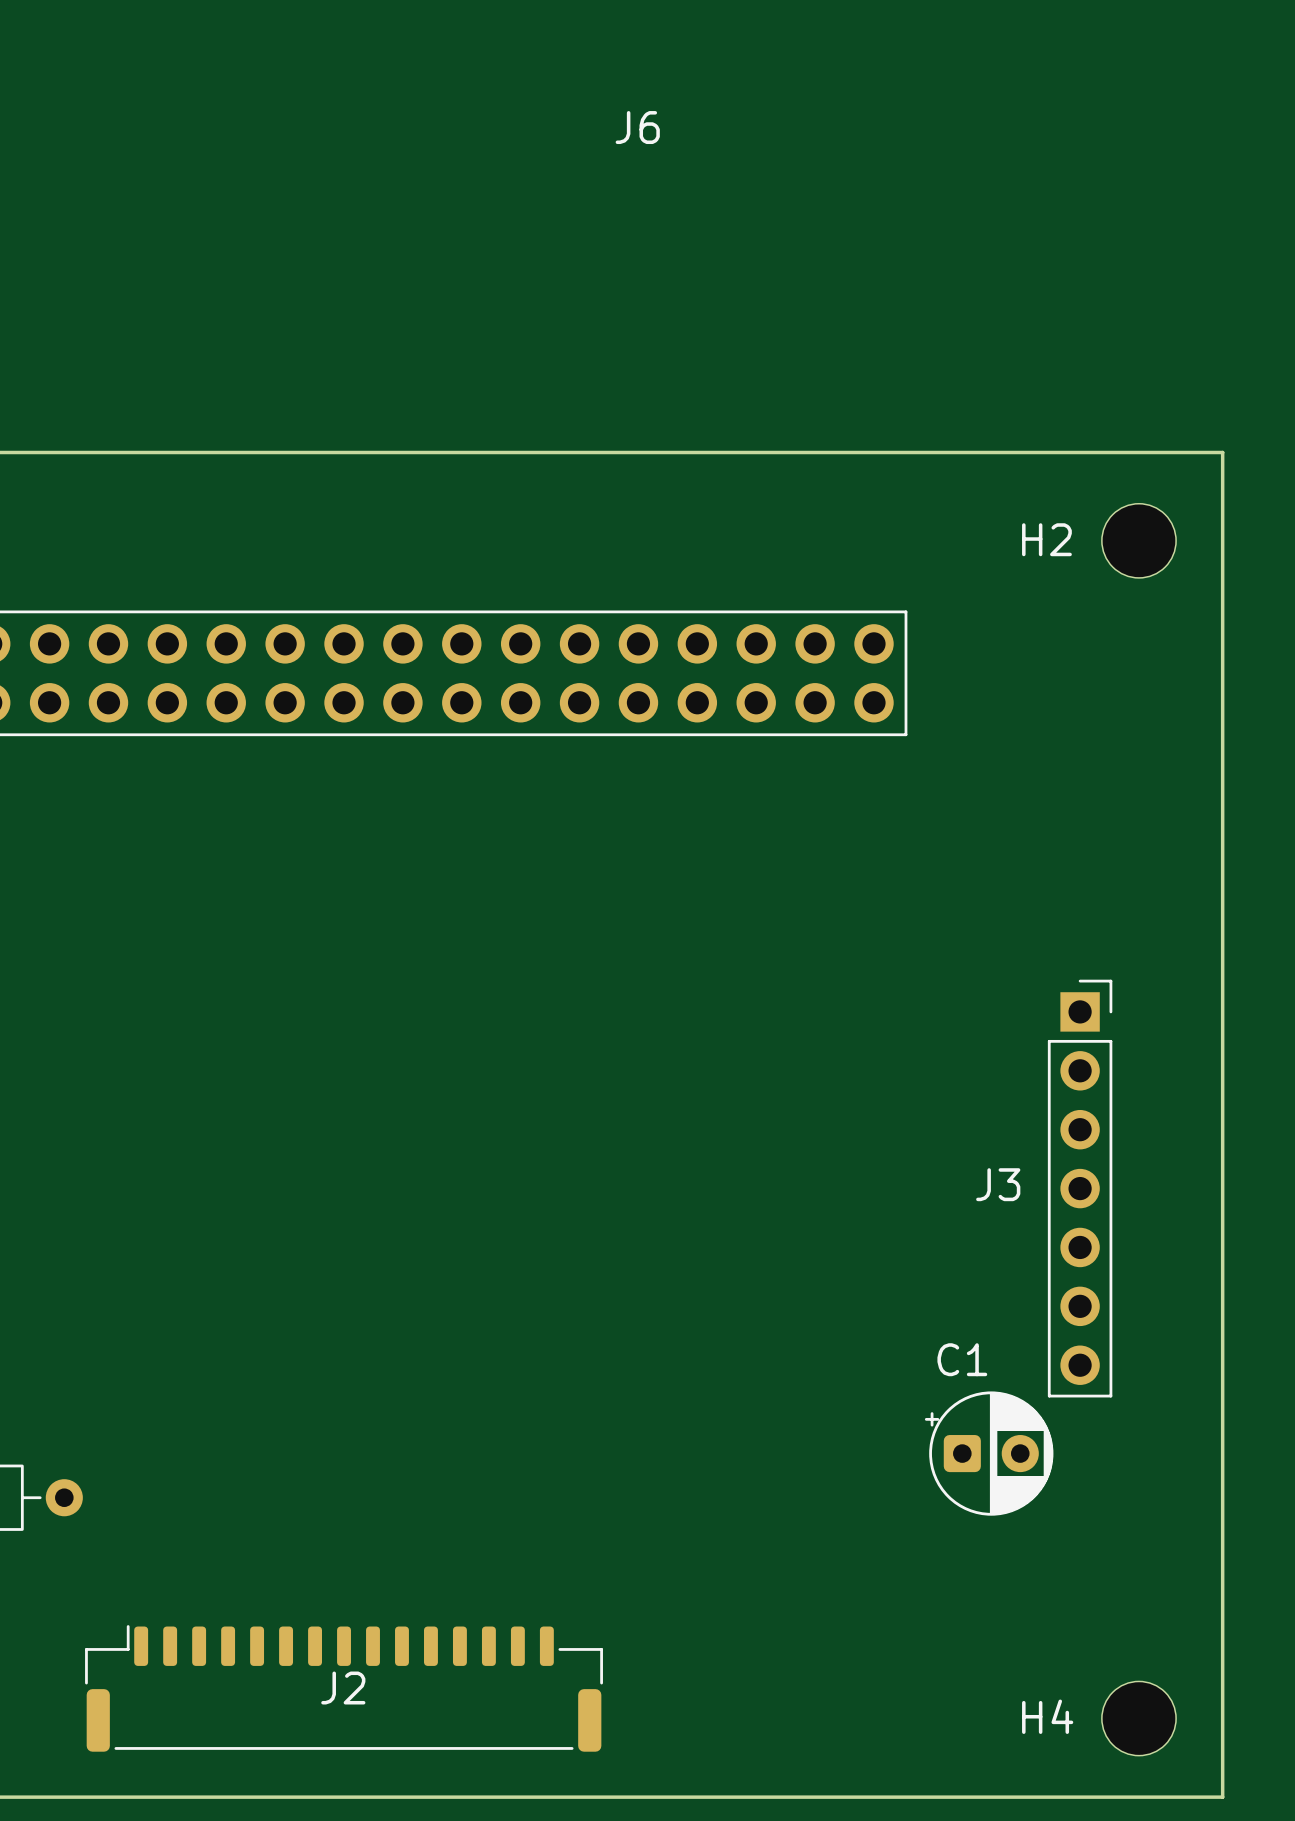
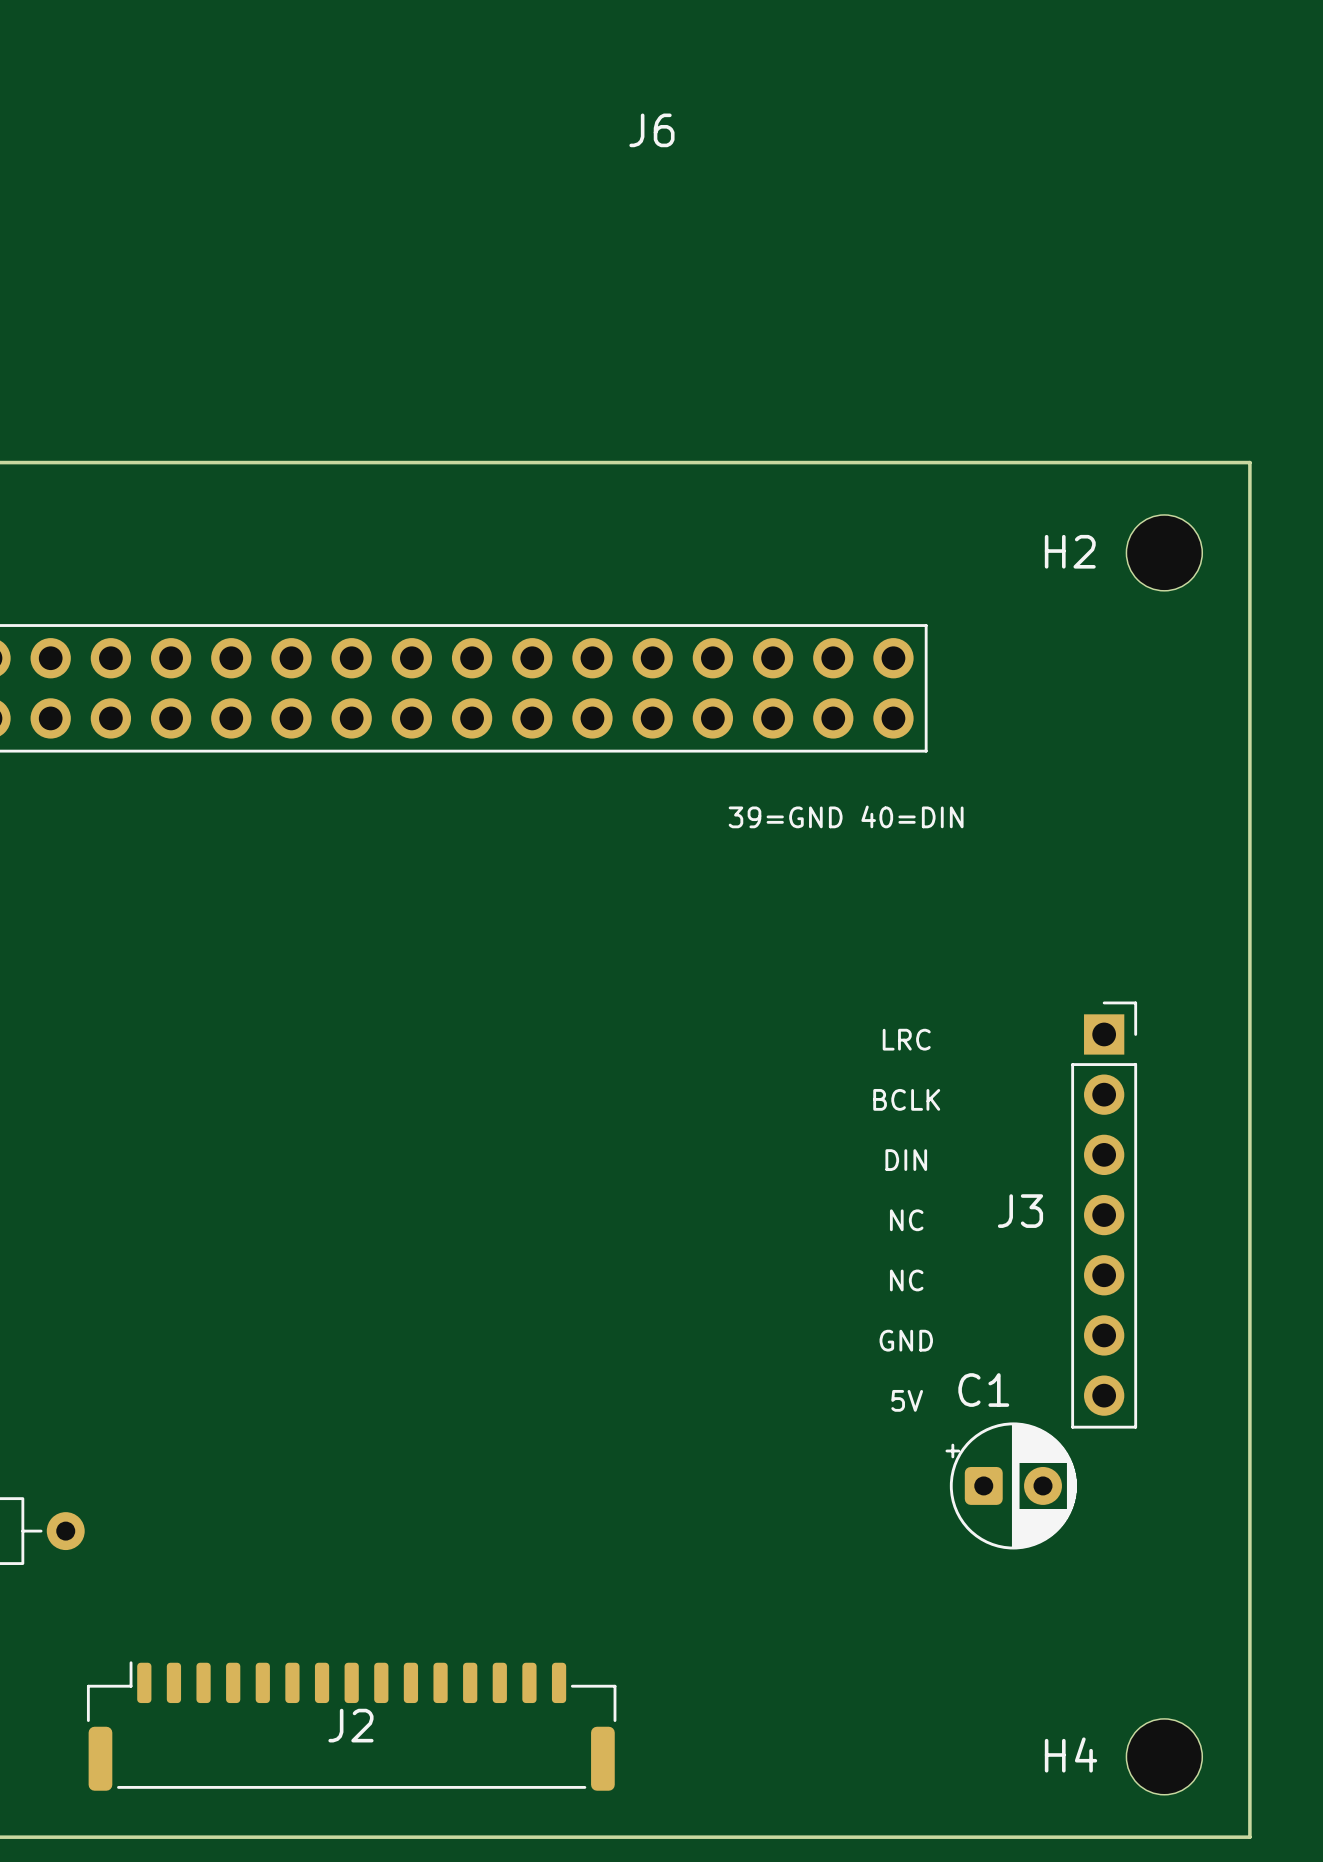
text: none -> 39=GND 40=DIN (846, 816)
text: none -> LRC (906, 1039)
text: none -> BCLK (906, 1099)
text: none -> DIN (906, 1160)
text: none -> NC (906, 1220)
text: none -> NC (906, 1280)
text: none -> GND (906, 1340)
text: none -> 5V (907, 1400)

